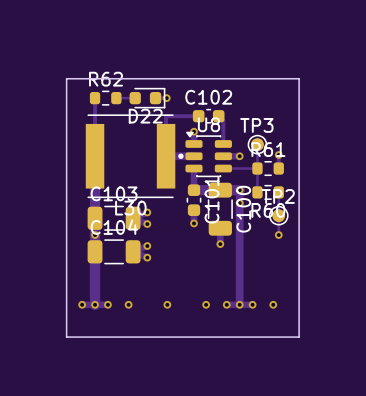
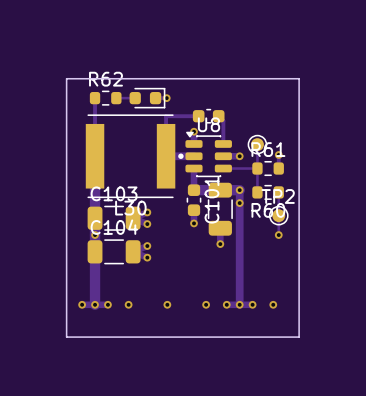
C102 name: C102 (208, 97) -> none
D22 name: D22 (145, 116) -> none
TP3 name: TP3 (256, 125) -> none
C100 name: C100 (243, 209) -> none

